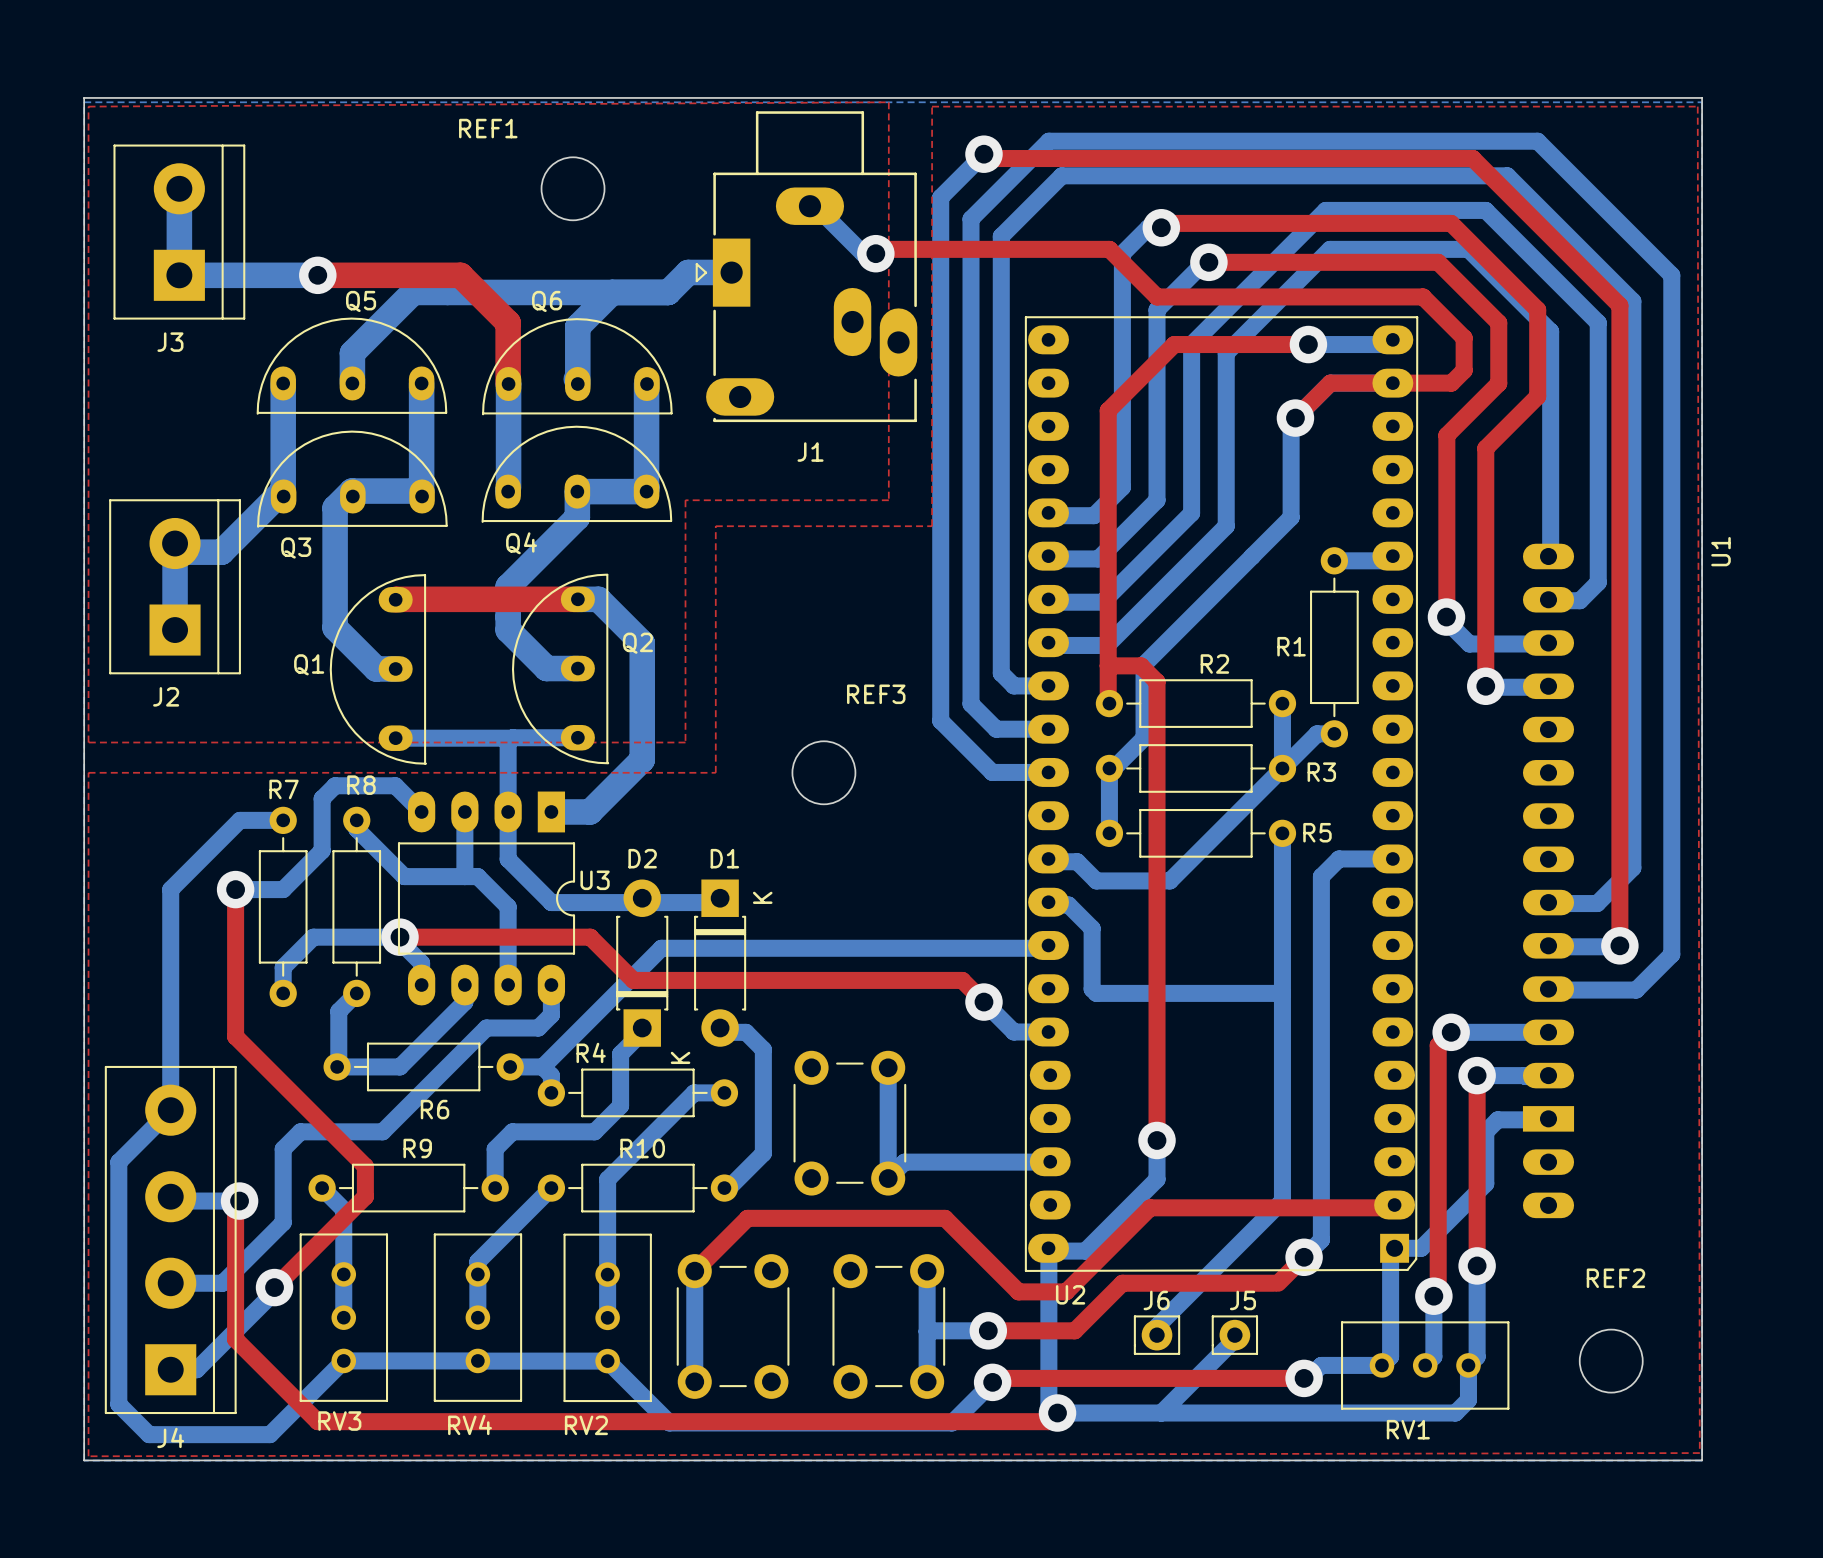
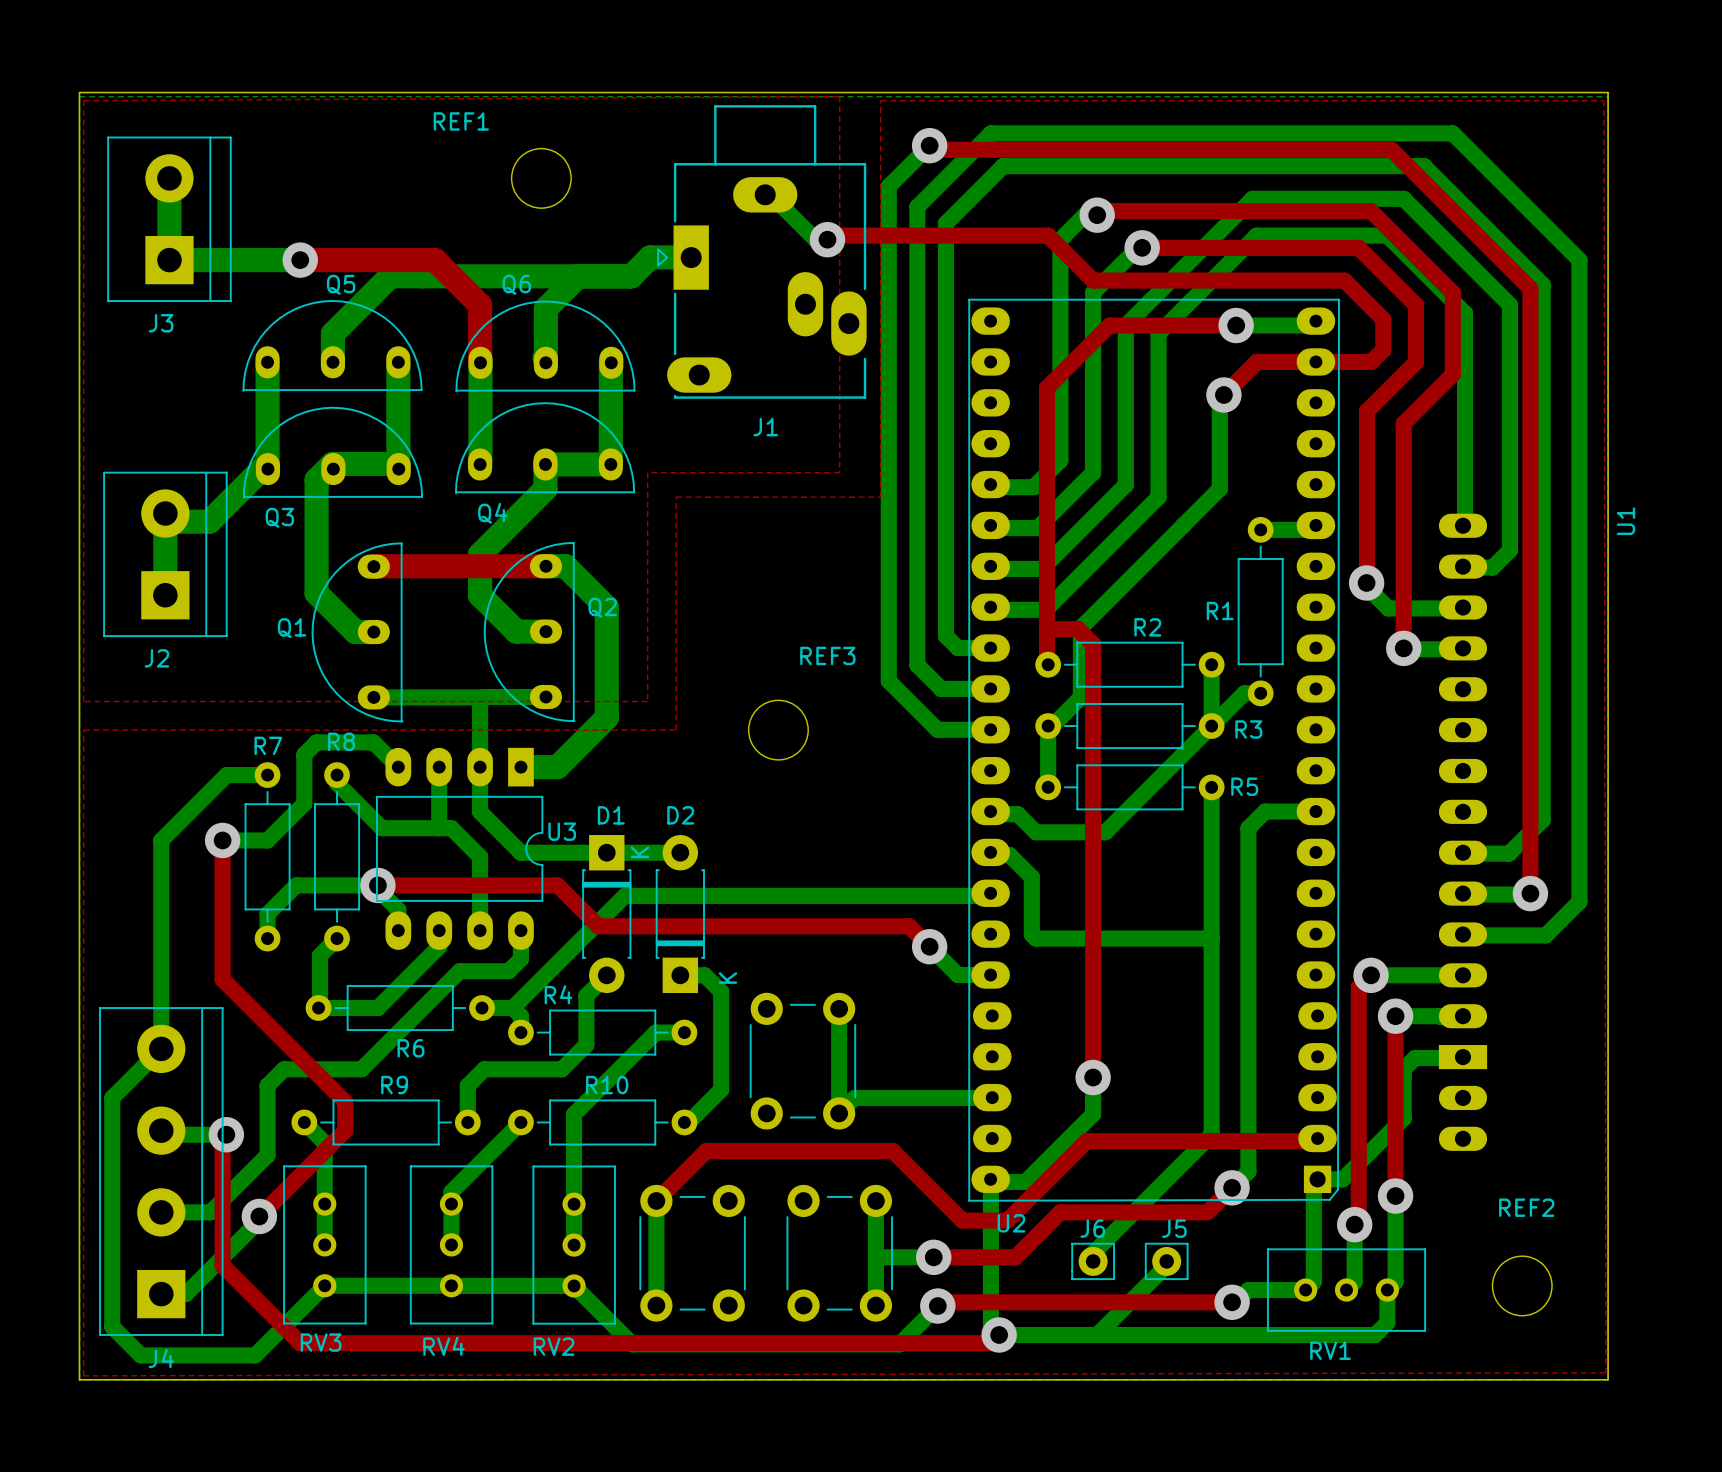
D1 text position: K (762, 897) -> K (639, 852)
D2 position: (642, 963) -> (680, 914)
D1 position: (720, 963) -> (606, 914)
D2 text position: K (680, 1057) -> K (728, 978)

